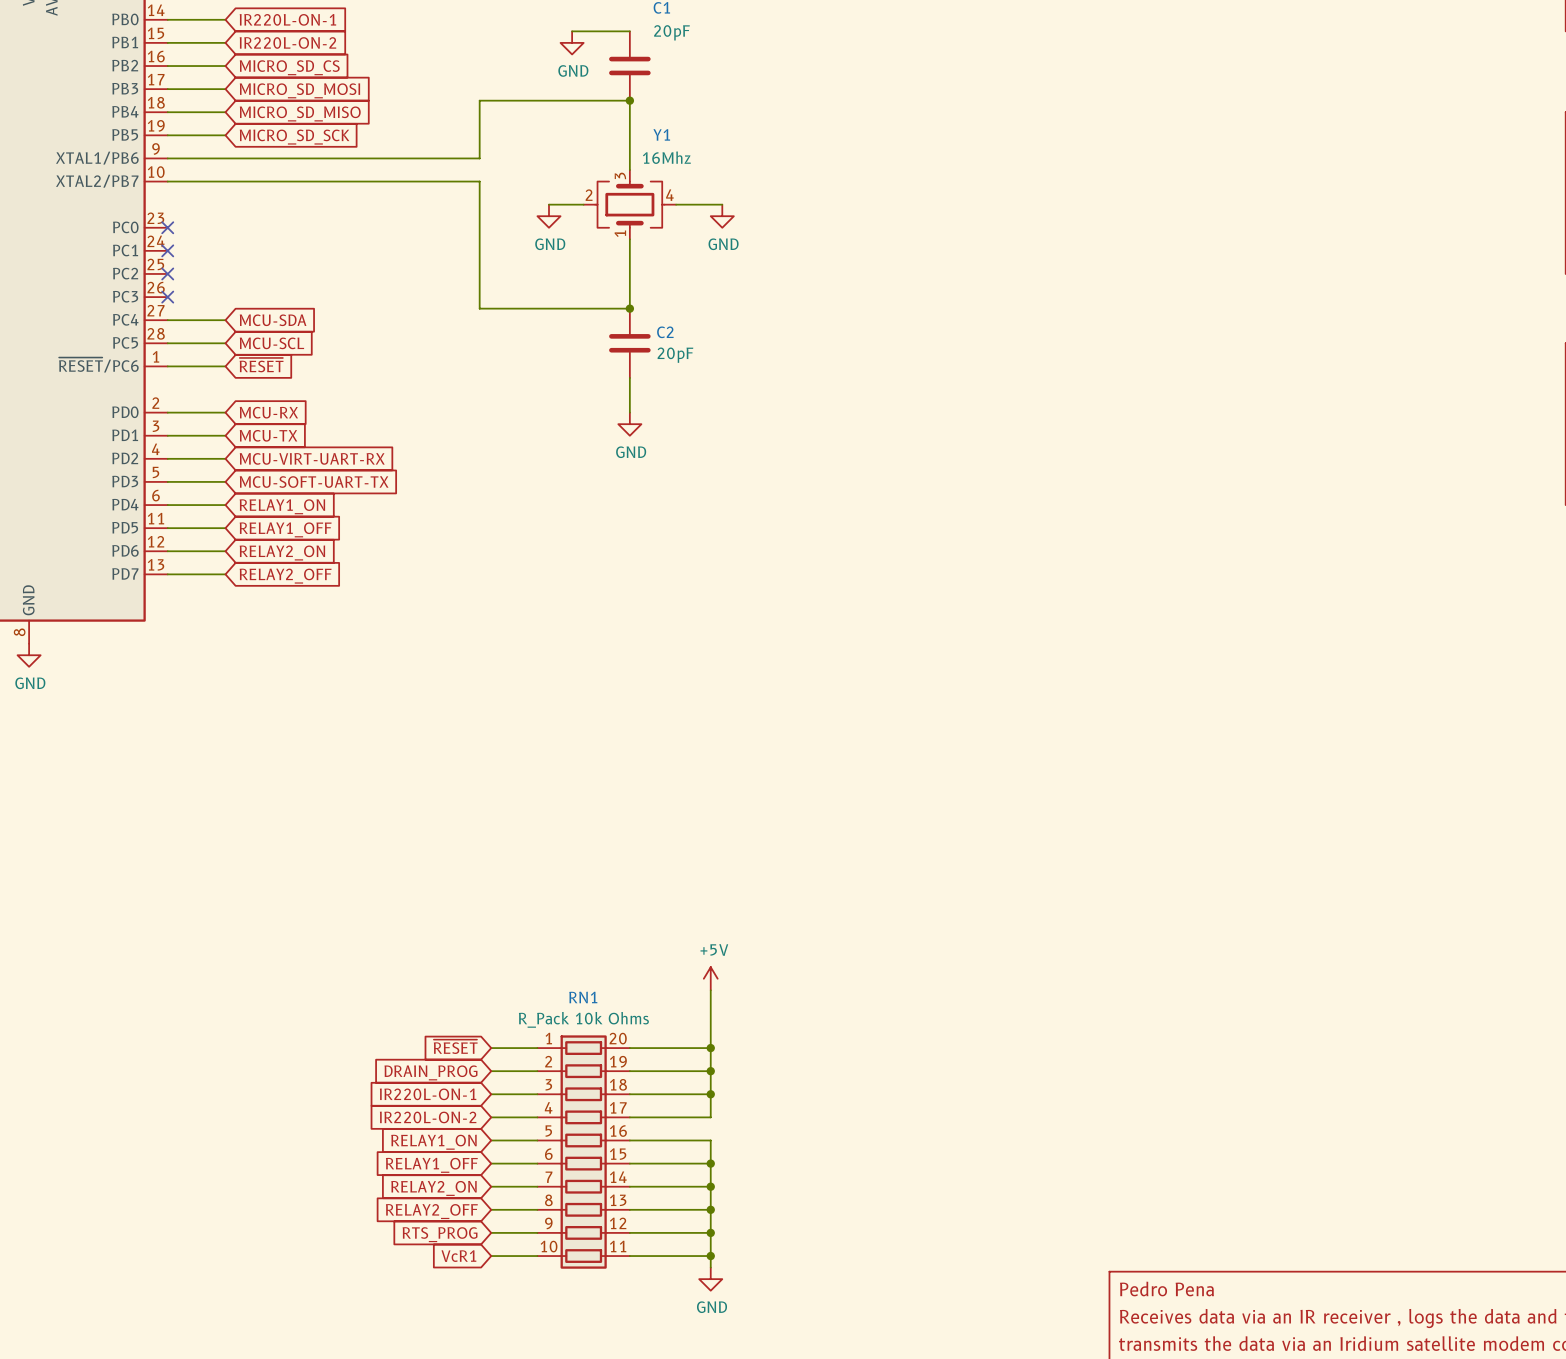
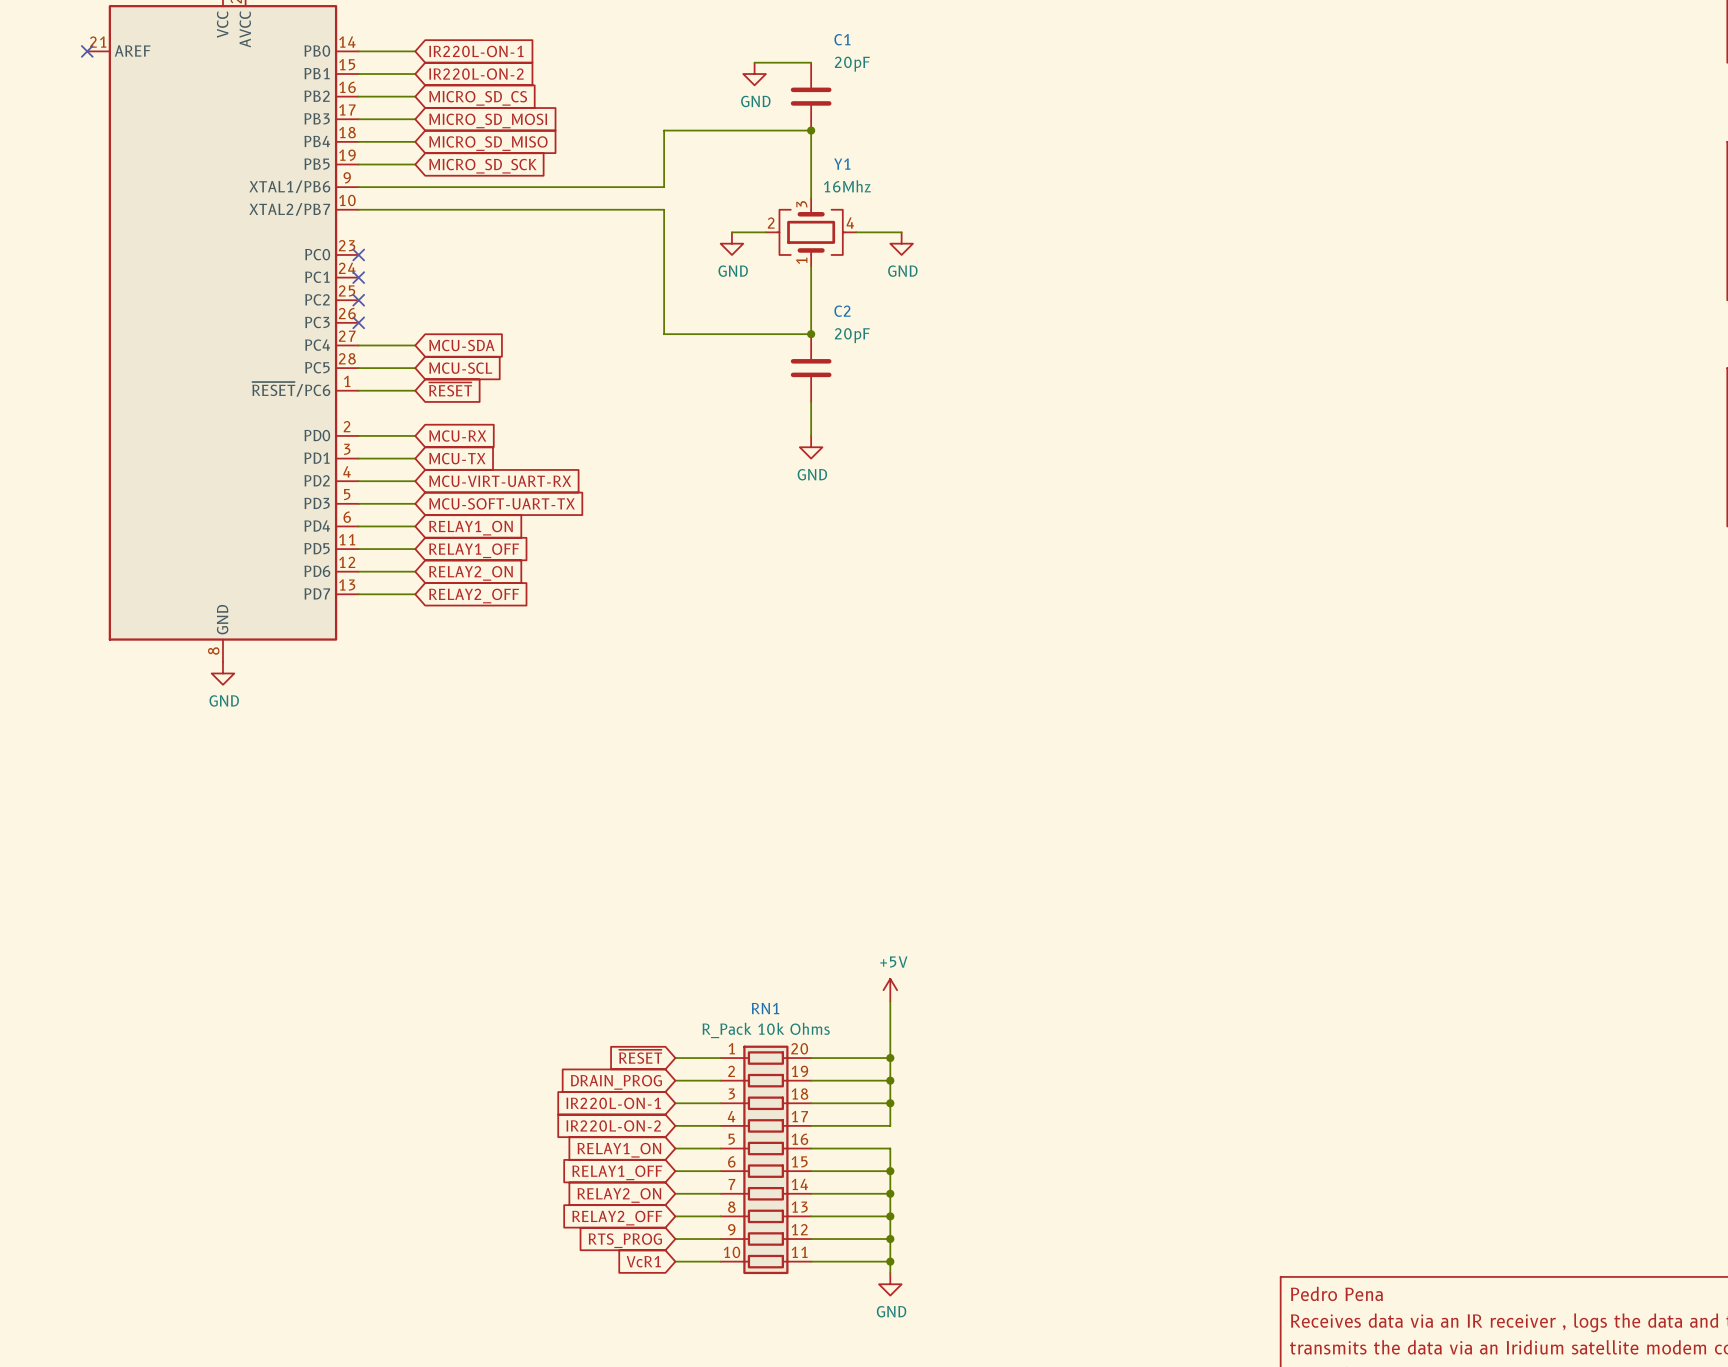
C2 name position: C2 (665, 332) -> C2 (842, 311)
C2 value position: 20pF (675, 355) -> 20pF (852, 335)

